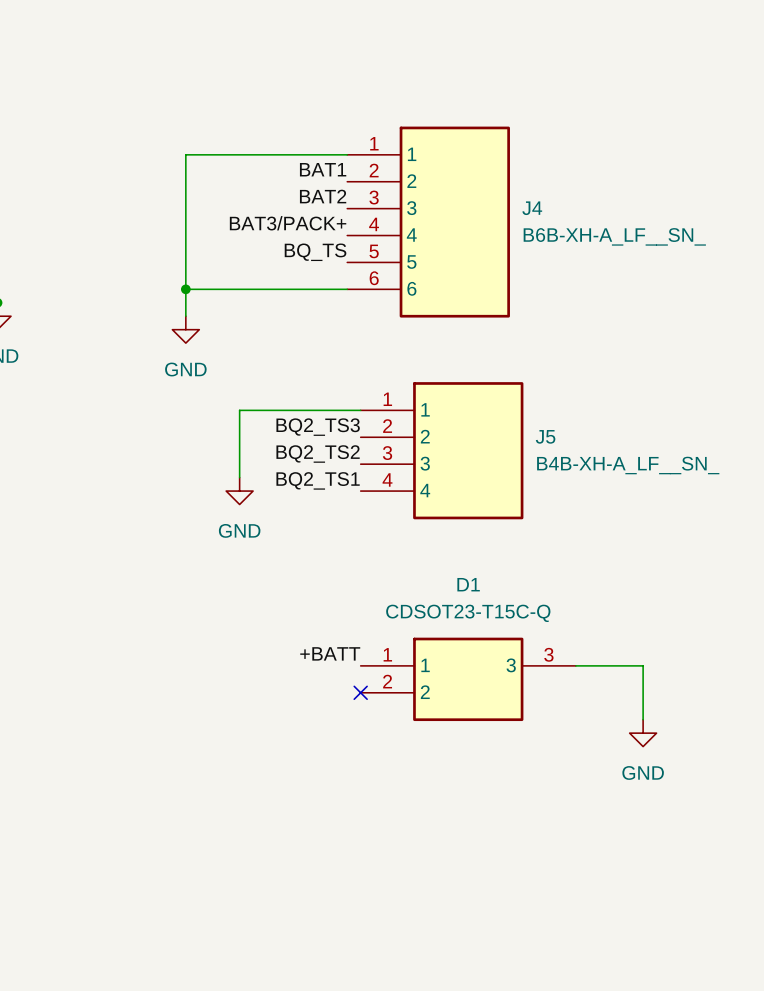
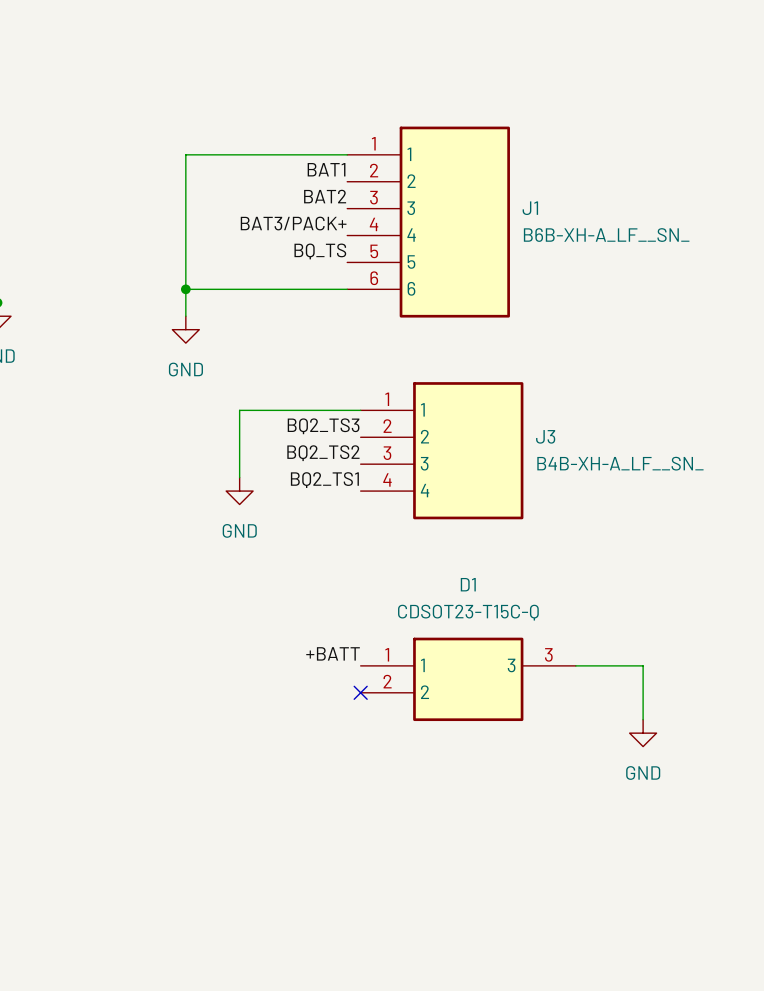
J4 name: J4 (532, 208) -> J1 (530, 208)
J5 name: J5 (545, 436) -> J3 (545, 436)

